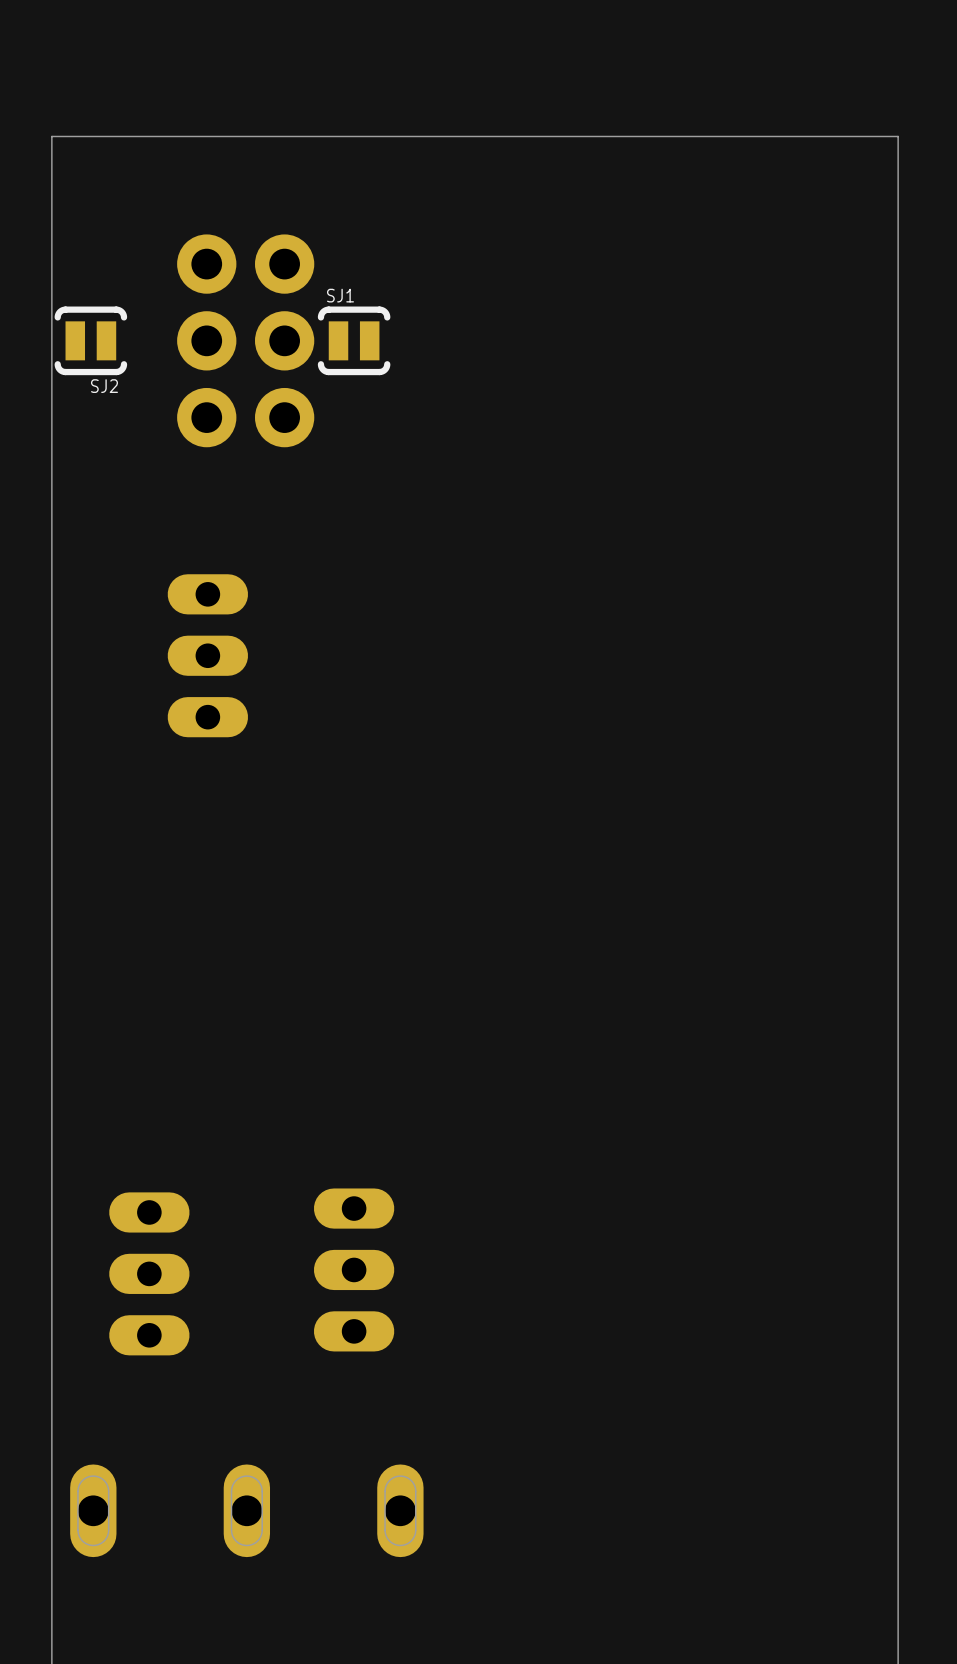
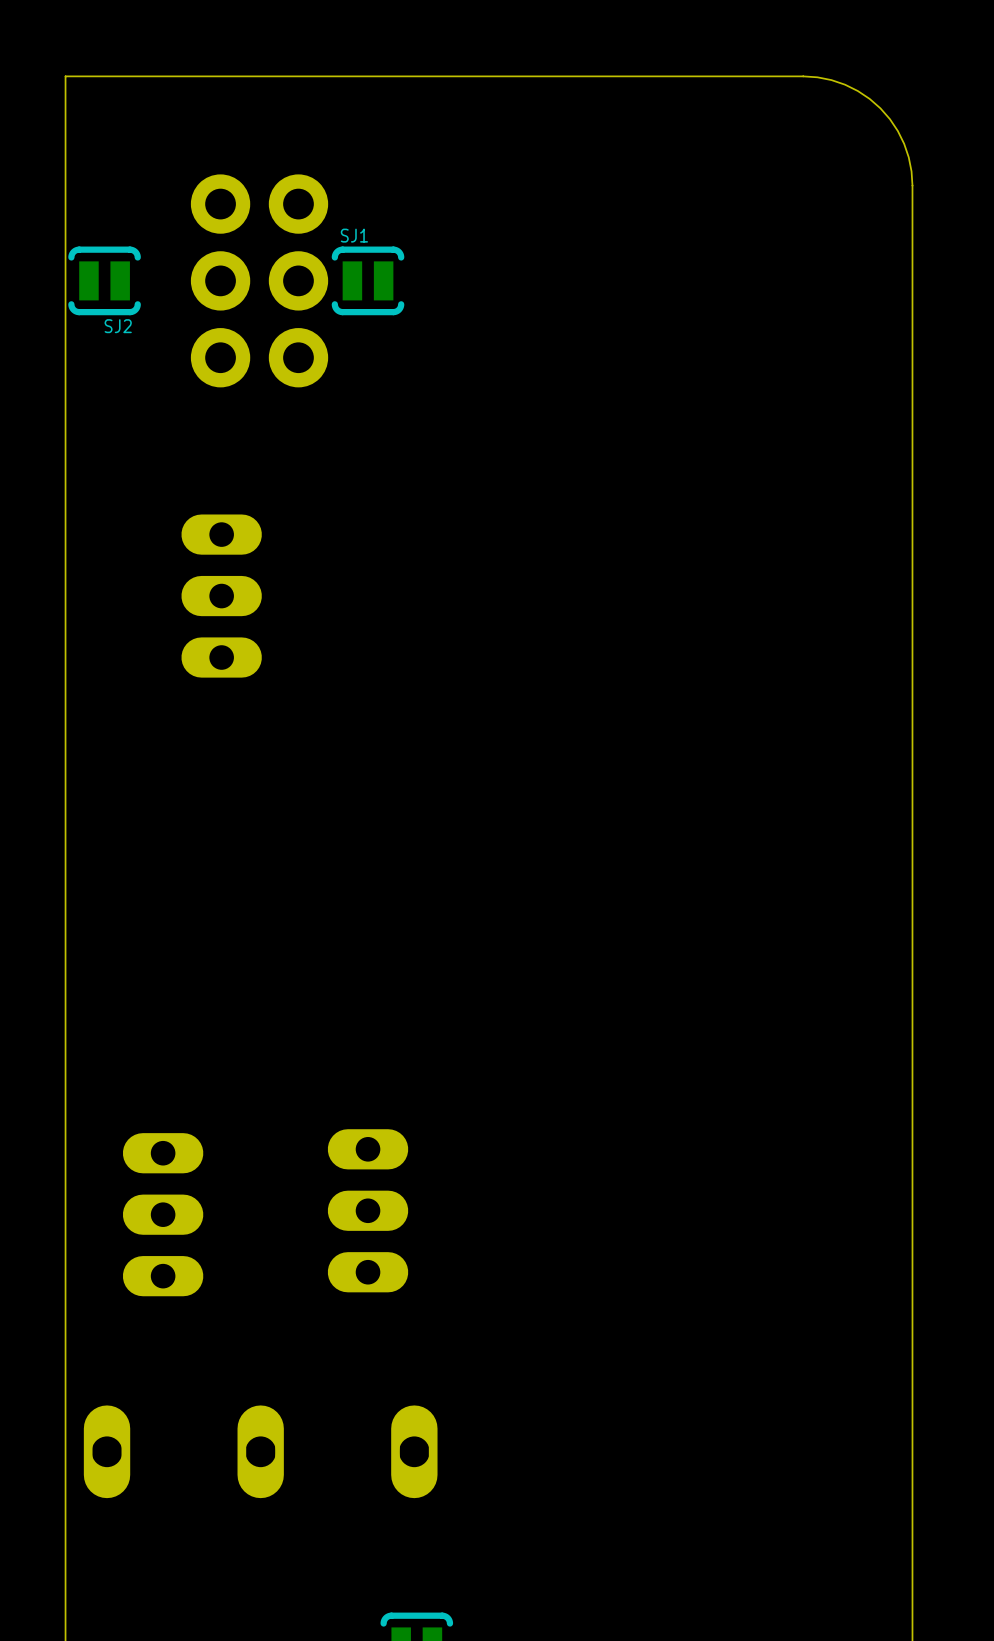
board edge: (788, 136) (898, 136) (898, 245) -> (803, 76) (817, 77) (845, 84) (869, 98) (880, 108) (889, 119) (904, 143) (911, 171) (912, 185)

